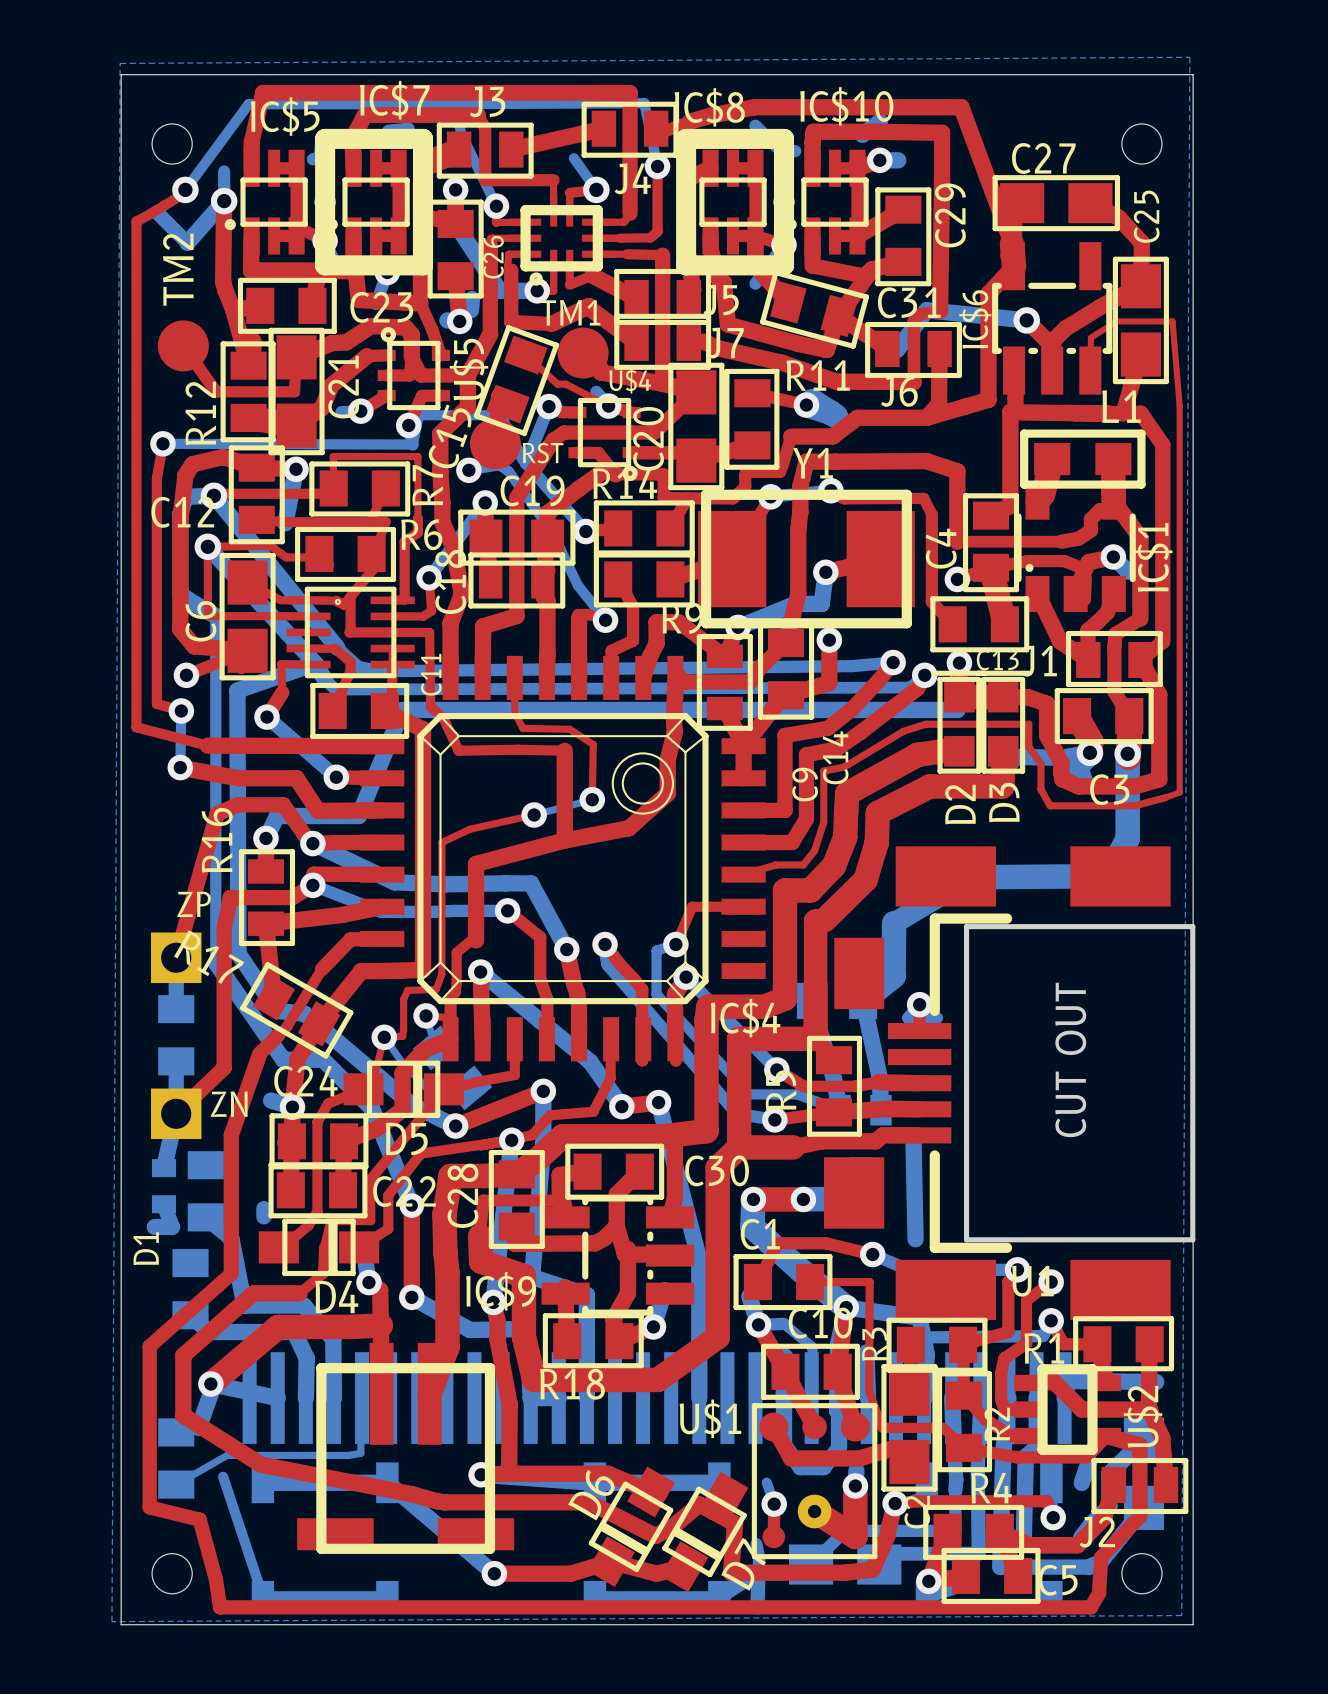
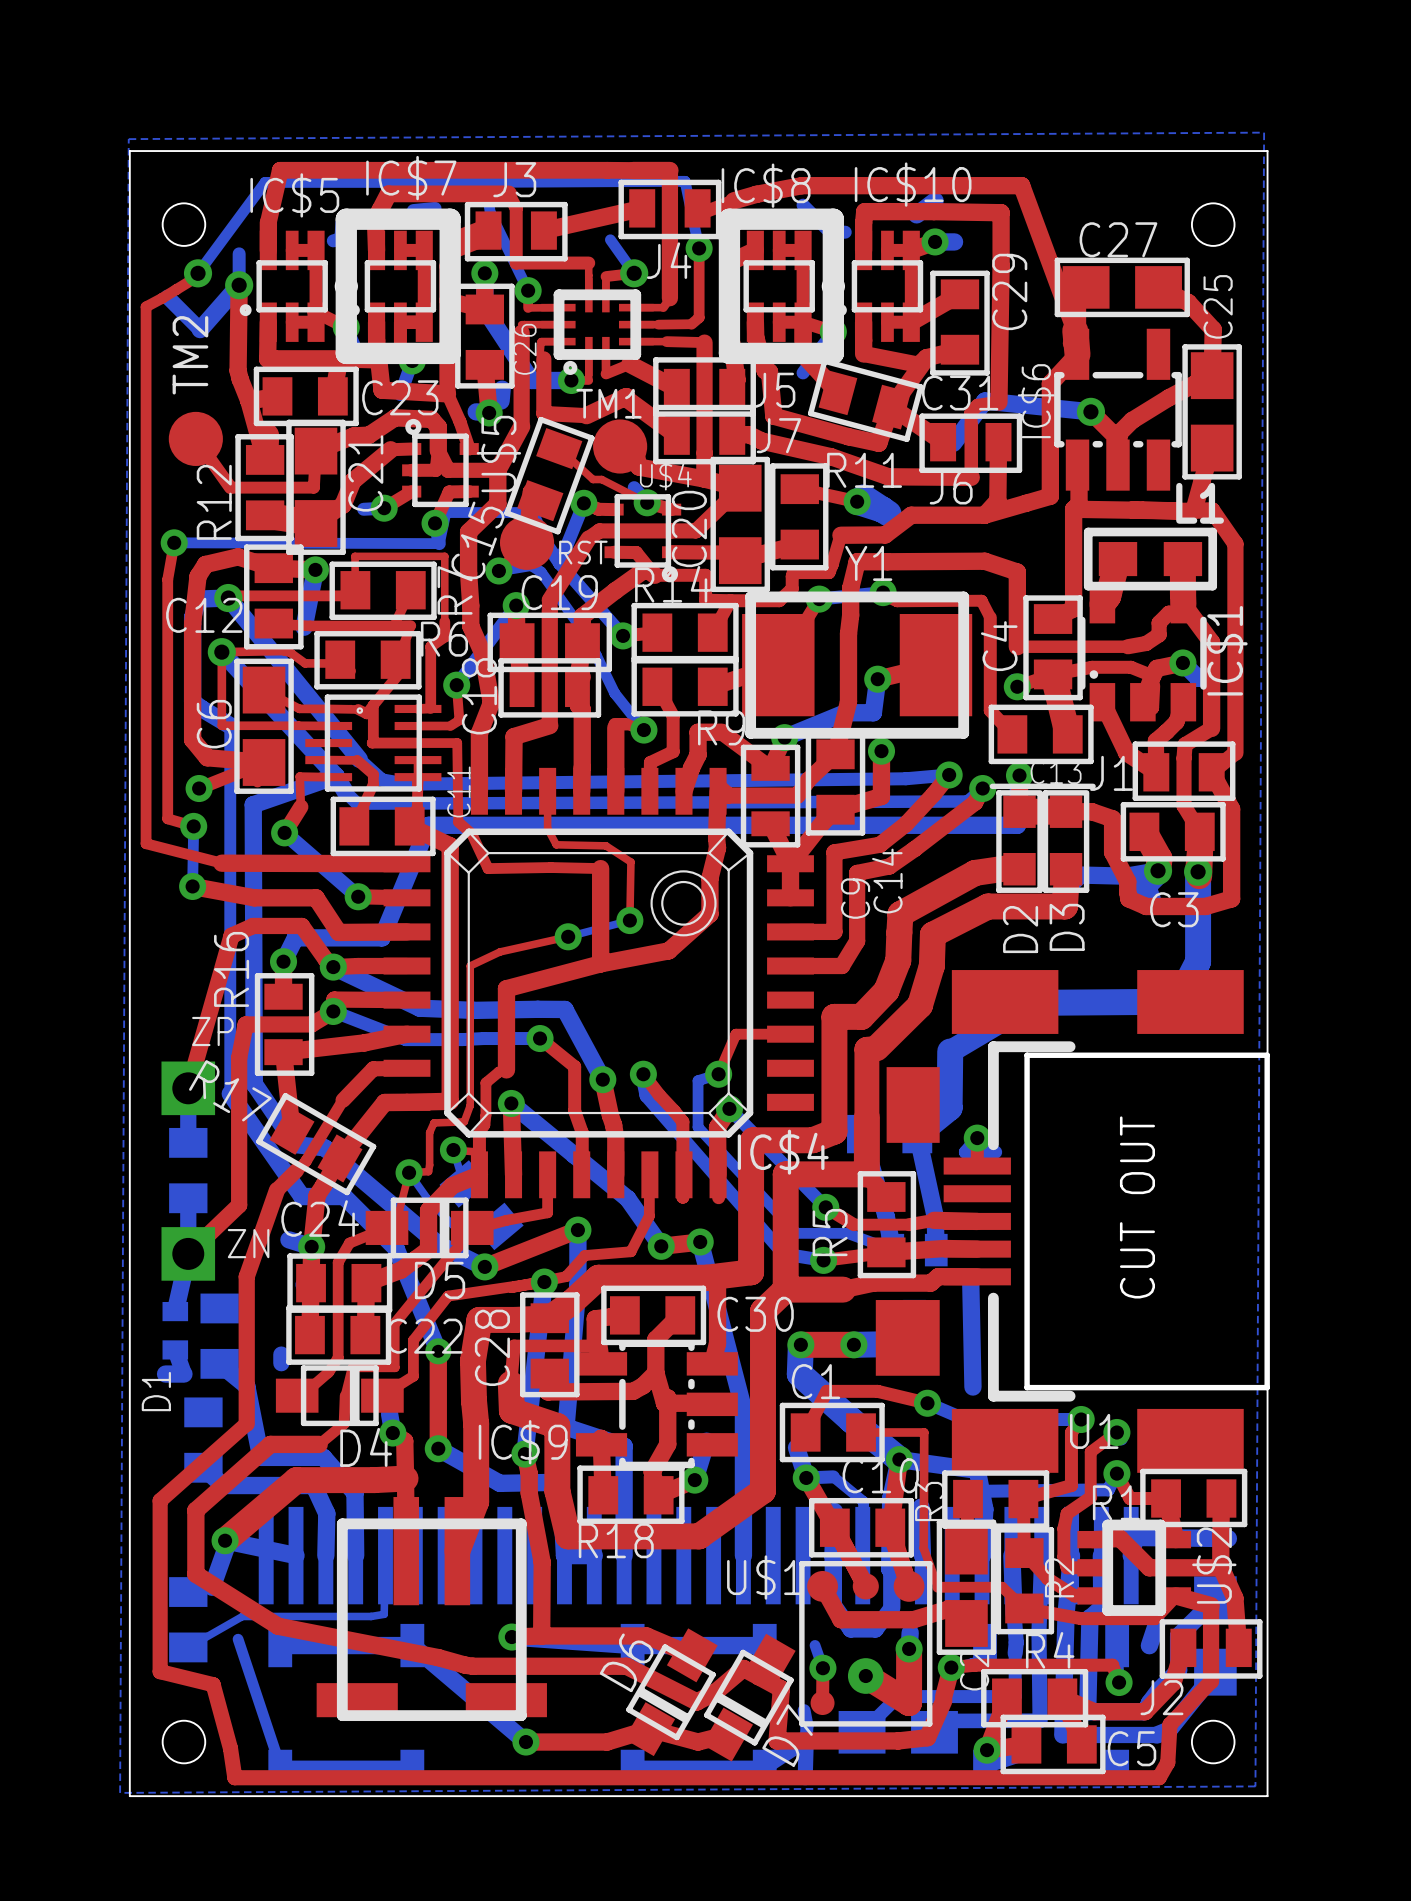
top track: (1090, 370) (1090, 337) (1116, 321) (1172, 321) (1179, 406) (1179, 792) (1134, 805) (1050, 805) (1040, 789) (1040, 764) (1028, 746) (1028, 724) (925, 724) (903, 731) (844, 767) (823, 771) (823, 822) (814, 850) (803, 864) (775, 864) (743, 874) -> none

